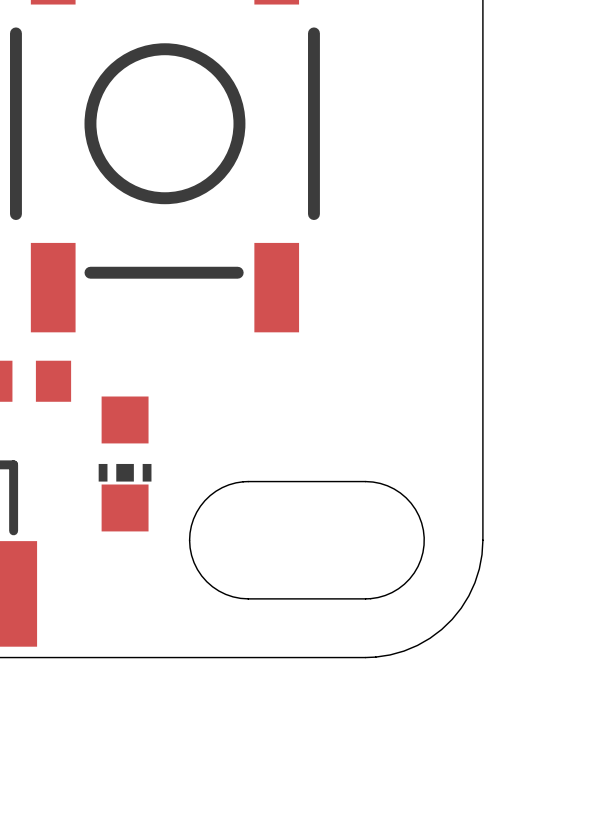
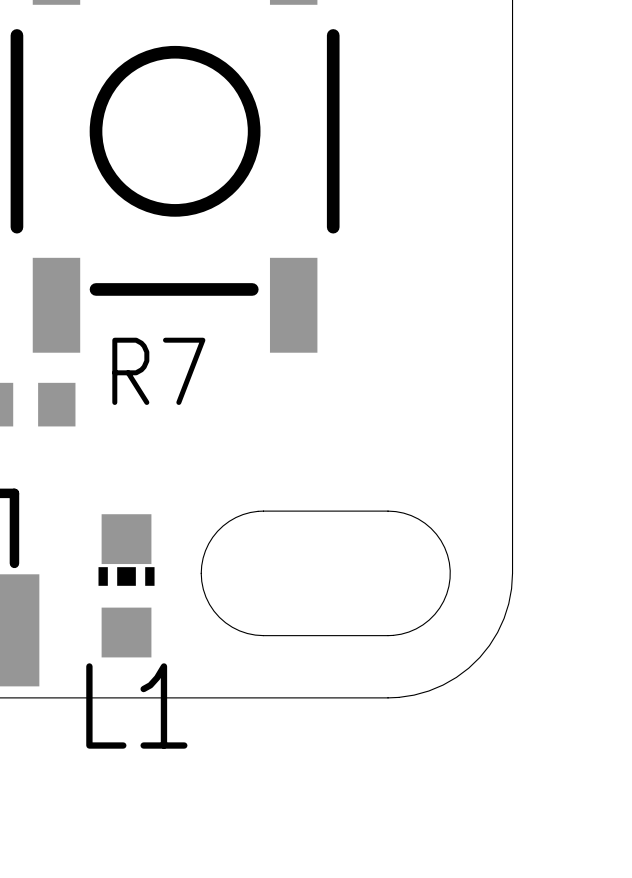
R7 name: none -> R7 (158, 371)
part: (125, 463) -> none
L1: none -> (126, 585)

